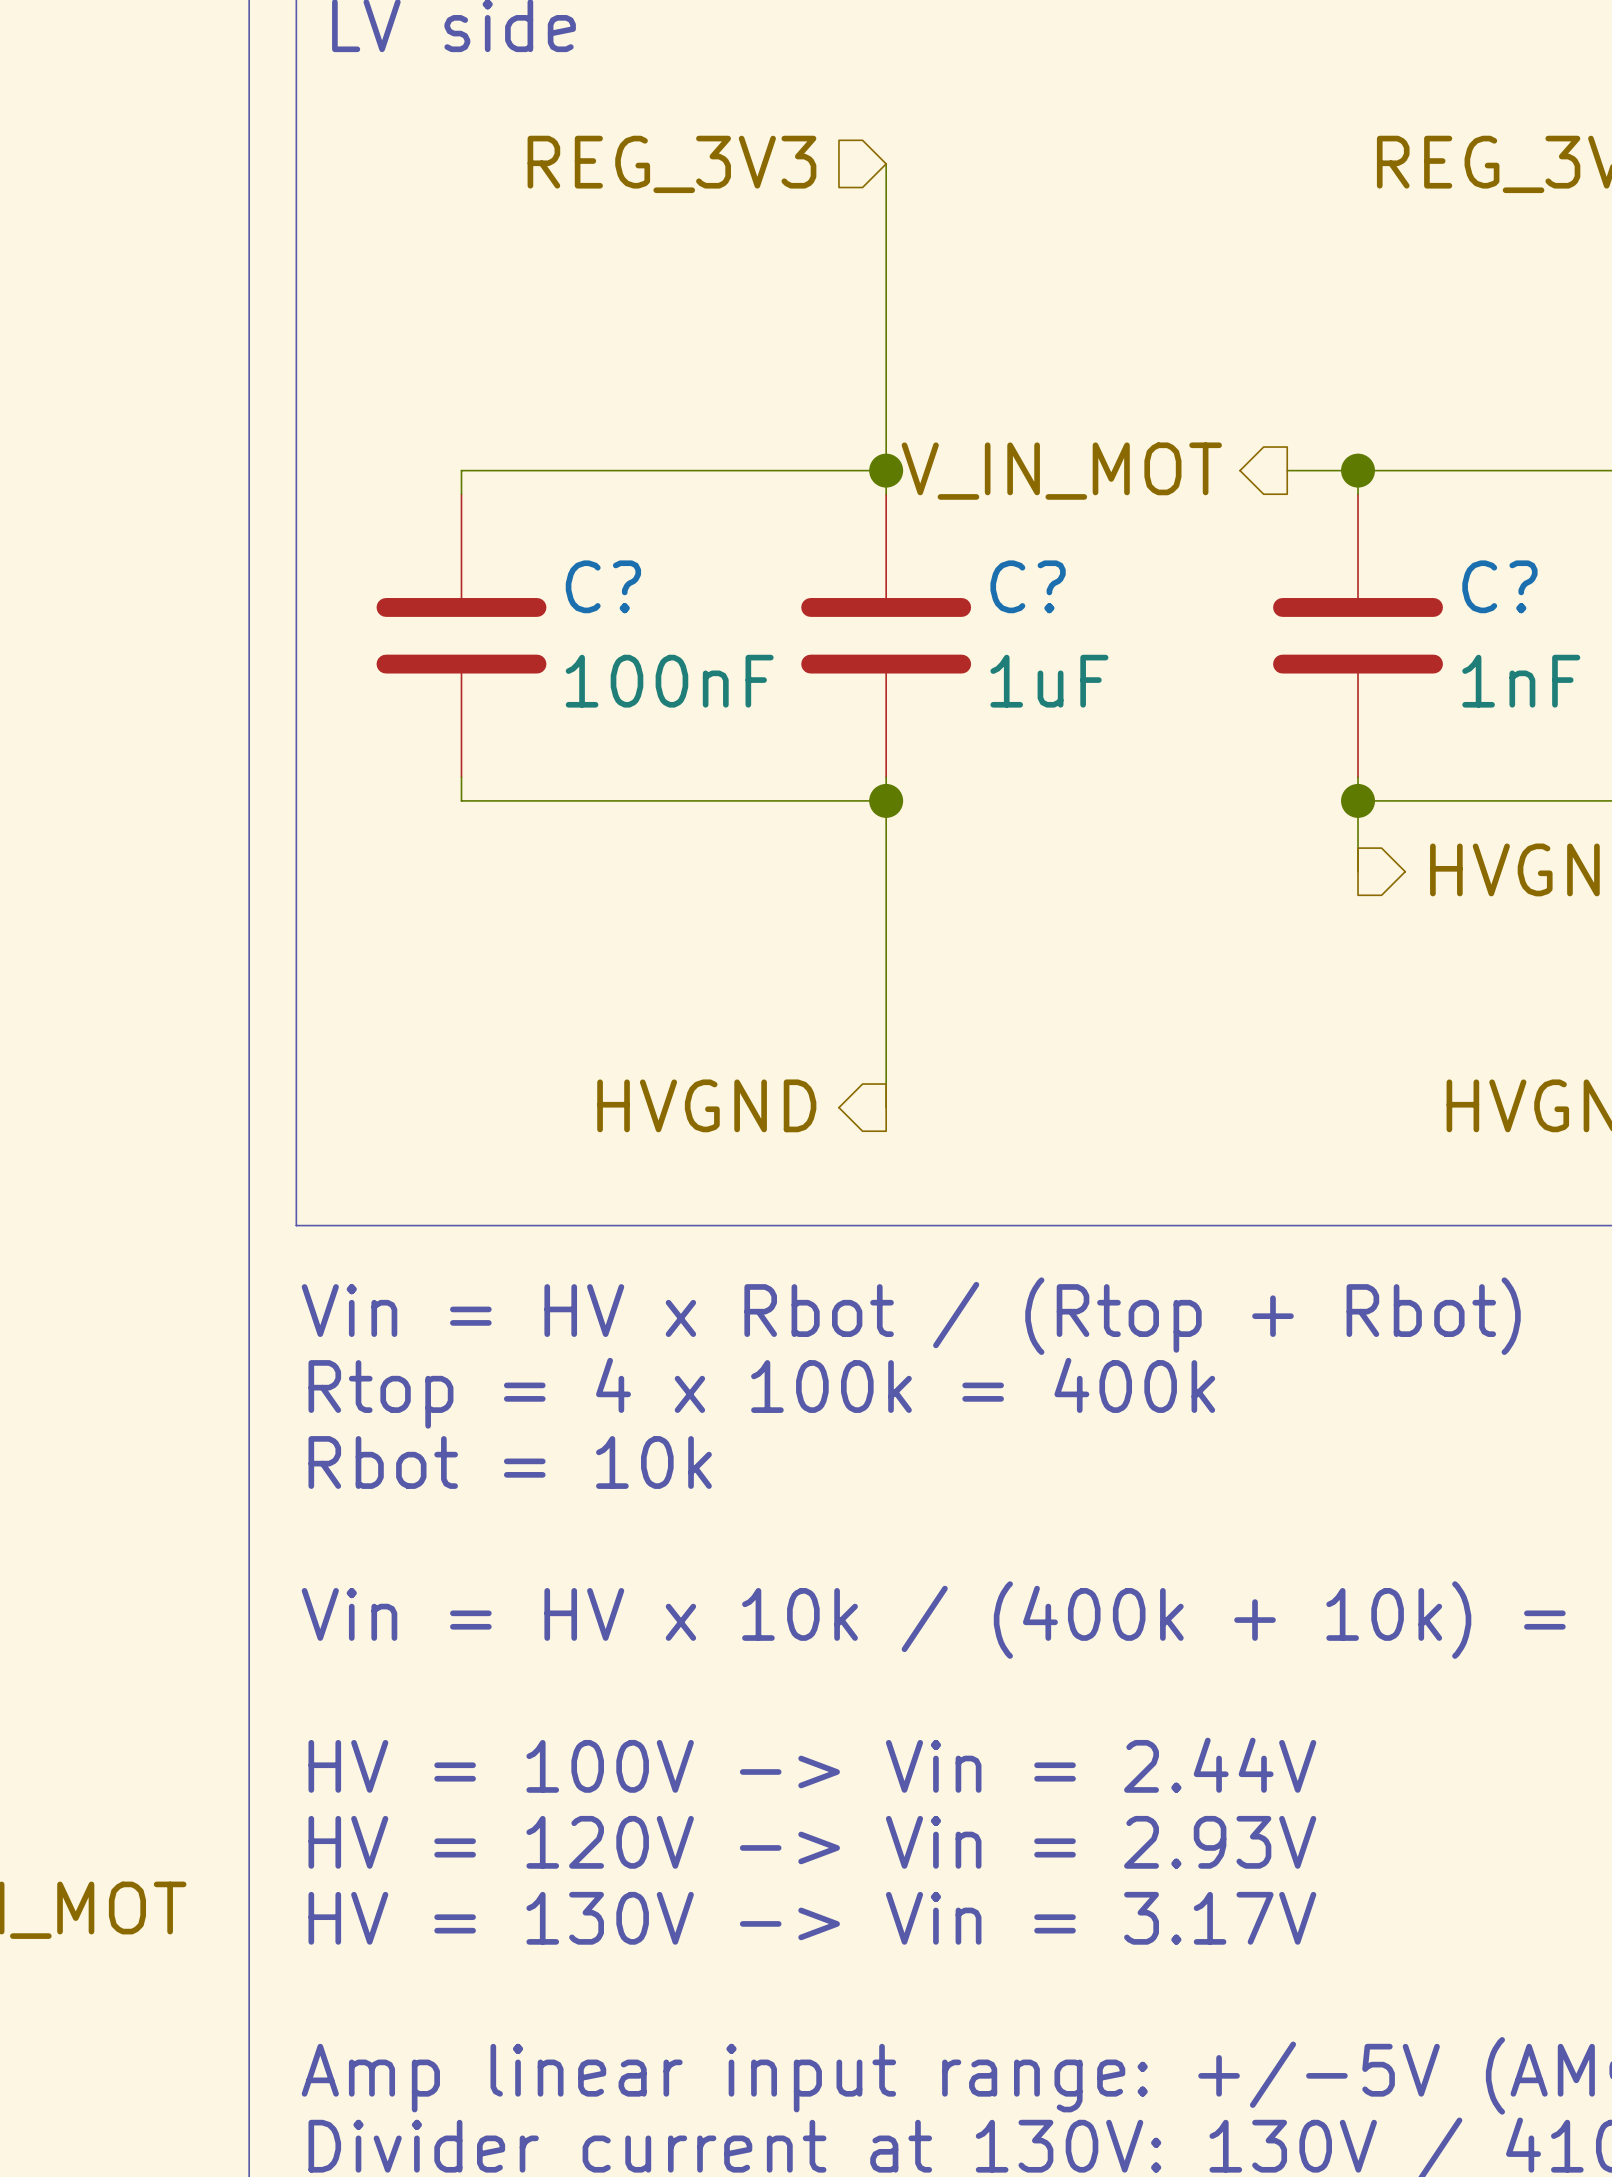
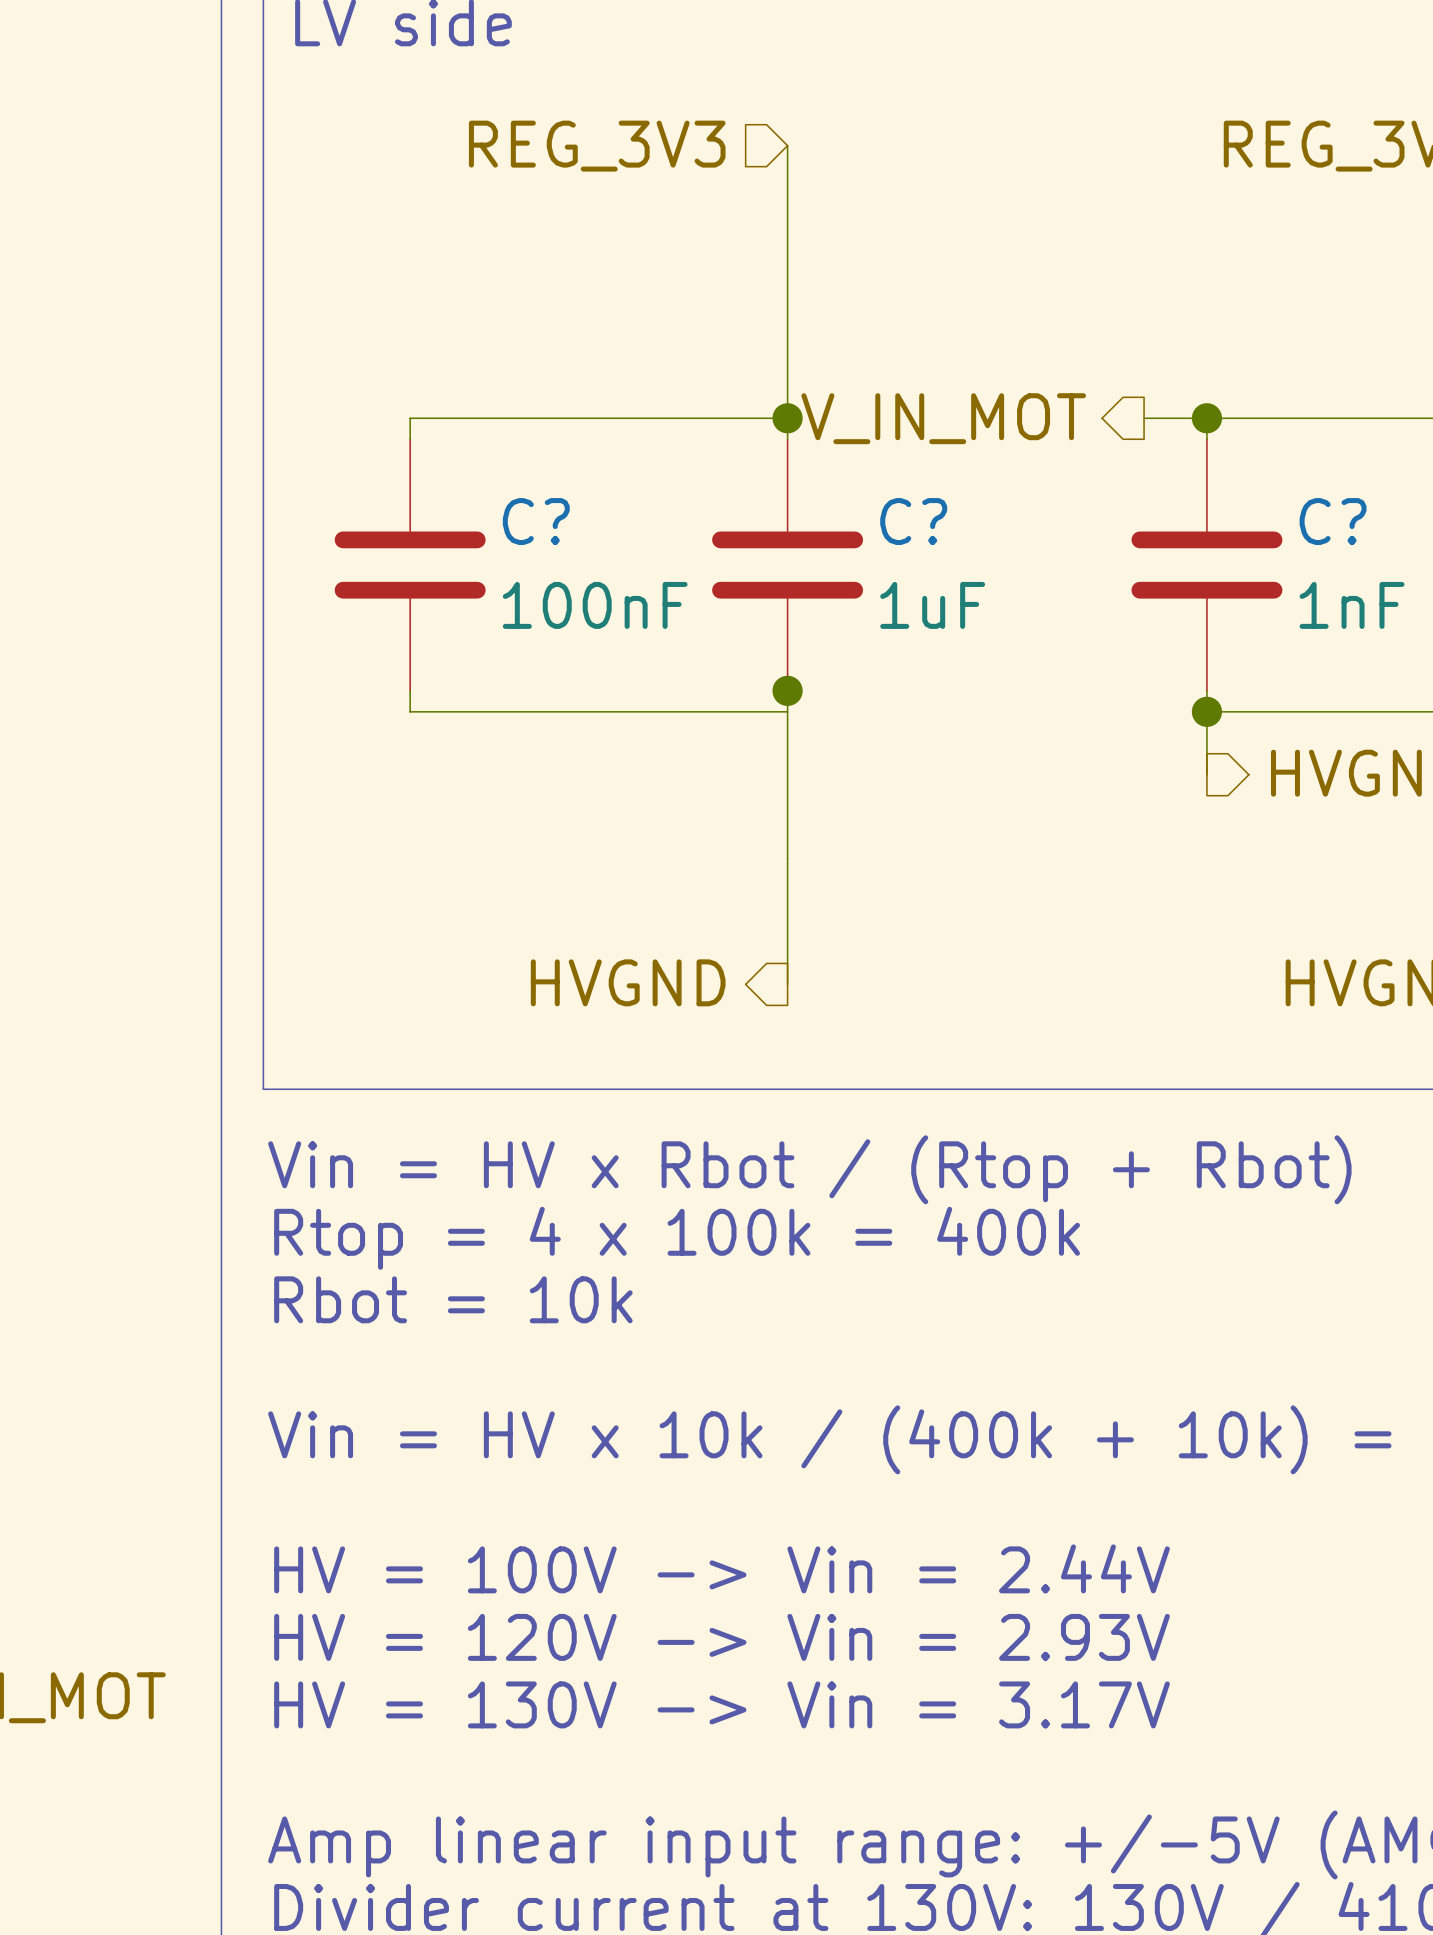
junction position: (886, 800) -> (787, 690)

